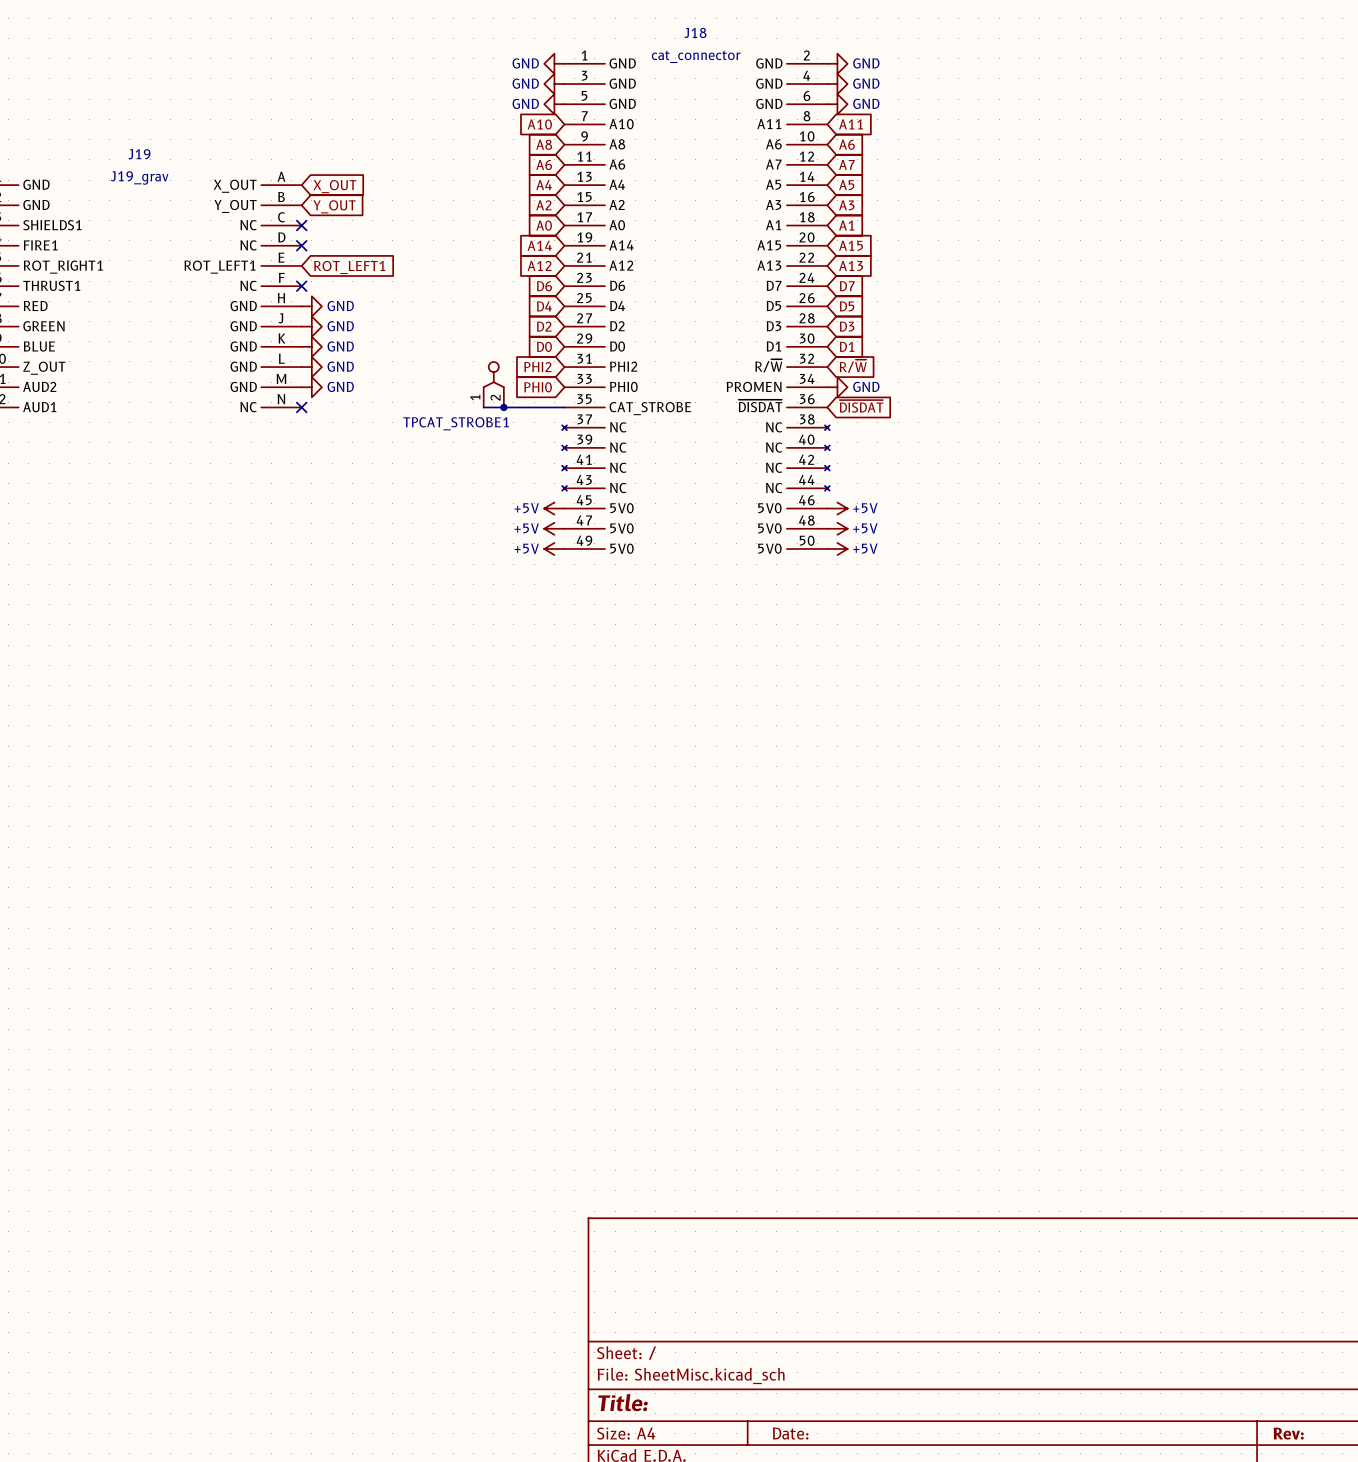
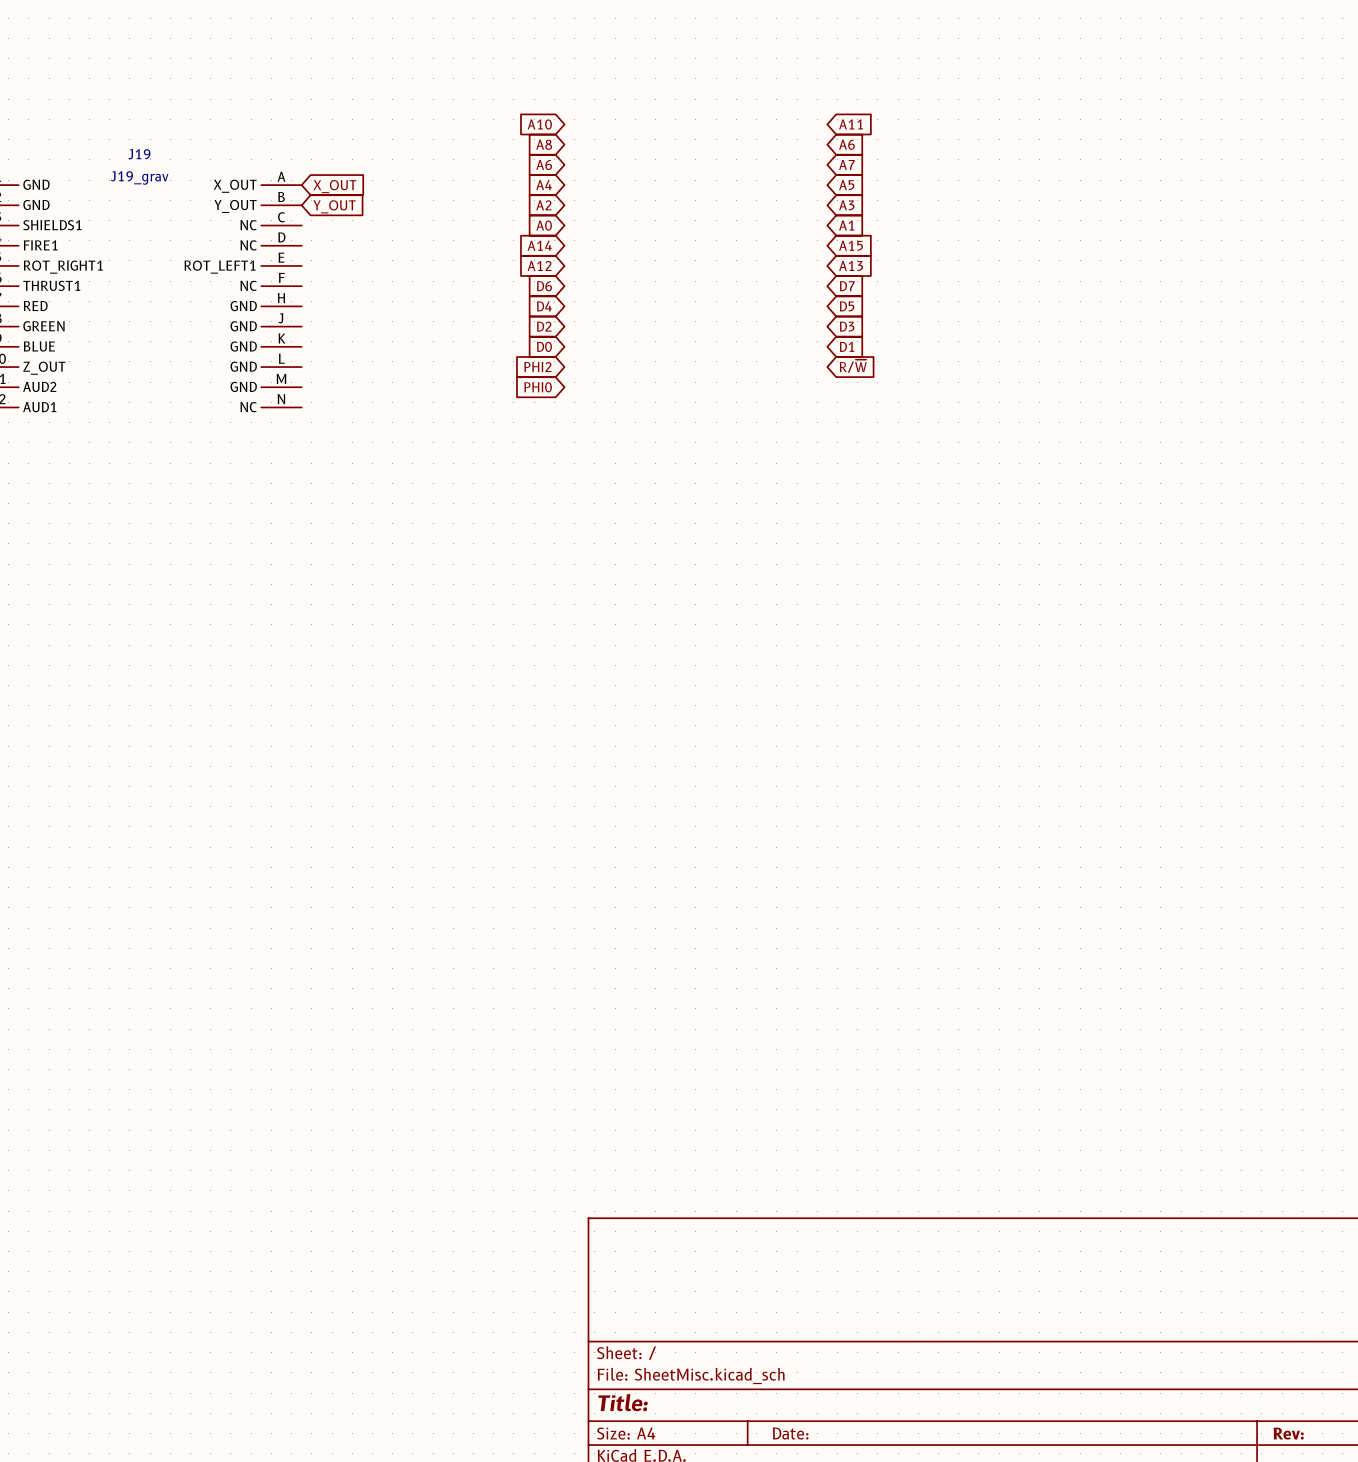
power symbol: GND (554, 63) -> none
power symbol: GND (837, 63) -> none
power symbol: GND (554, 84) -> none
power symbol: GND (837, 84) -> none
power symbol: GND (554, 104) -> none
power symbol: GND (837, 104) -> none
no-connect mark: (301, 225) -> none
no-connect mark: (301, 245) -> none
global label: ROT_LEFT1 (349, 267) -> none
no-connect mark: (301, 286) -> none
power symbol: GND (311, 306) -> none
J18: cat_connector (695, 306) -> none
power symbol: GND (311, 326) -> none
power symbol: GND (311, 346) -> none
power symbol: GND (311, 367) -> none
TPCAT_STROBE1: (493, 384) -> none
power symbol: GND (311, 387) -> none
power symbol: GND (837, 387) -> none
global label: ~{DISDAT} (861, 406) -> none
no-connect mark: (301, 407) -> none
wire: (483, 407) (564, 407) -> none
junction: (503, 407) -> none
power symbol: +5V (554, 508) -> none
power symbol: +5V (837, 508) -> none
power symbol: +5V (554, 528) -> none
power symbol: +5V (837, 528) -> none
power symbol: +5V (554, 548) -> none
power symbol: +5V (837, 548) -> none

